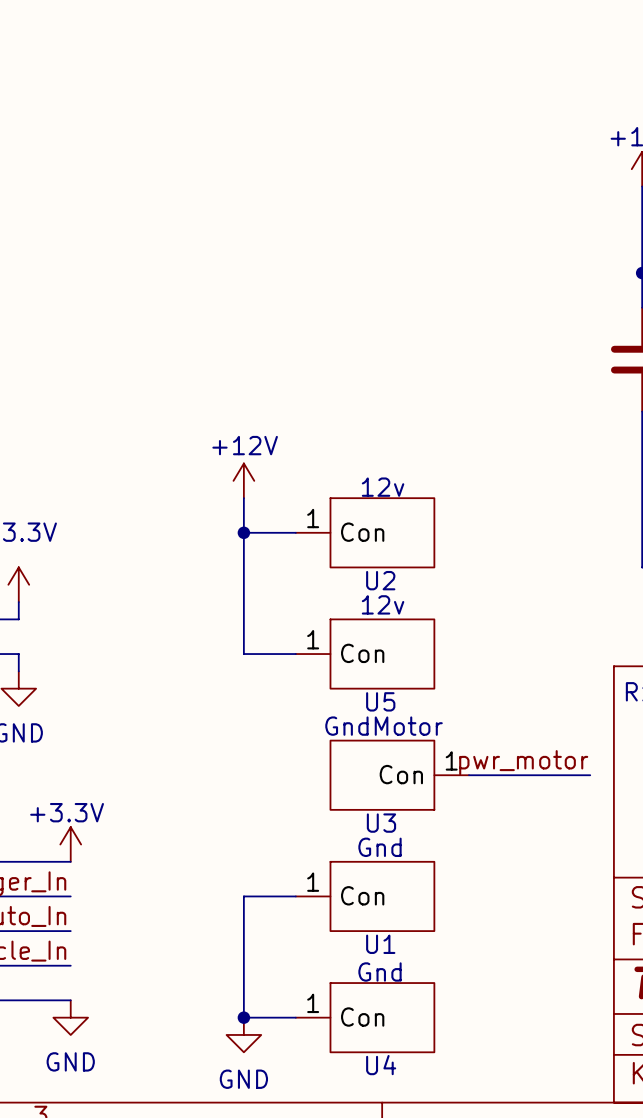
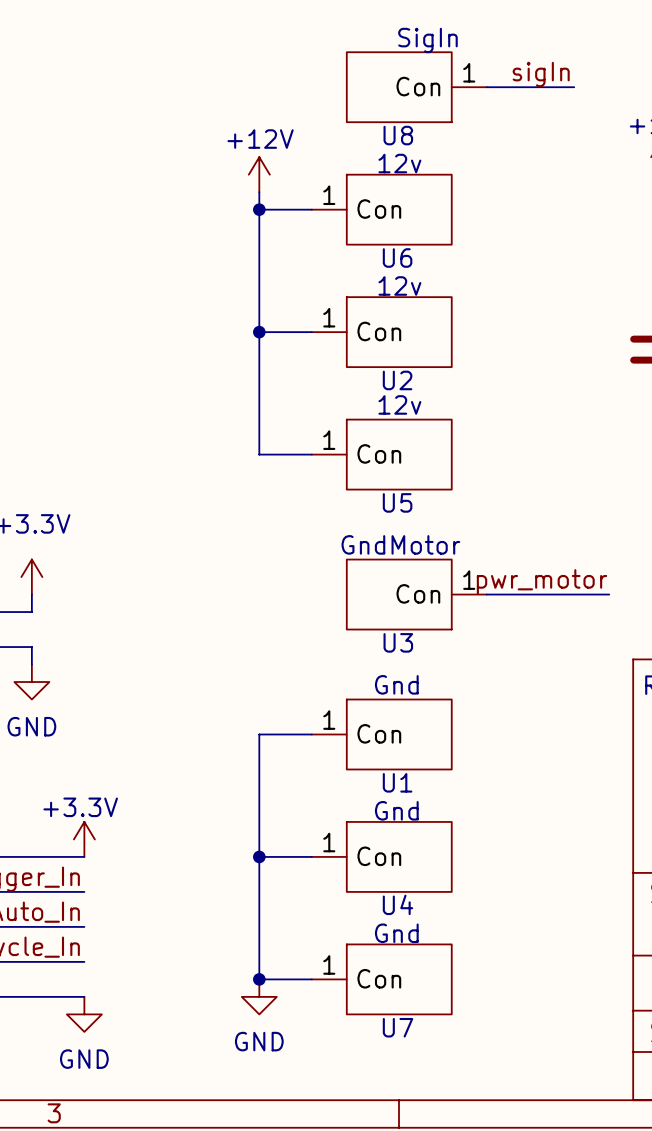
label: none -> sigIn (541, 74)
U8: none -> SigIn (416, 87)
wire: none -> (486, 87) (574, 87)
wire: none -> (259, 192) (259, 454) (311, 454)
wire: none -> (259, 209) (311, 209)
junction: none -> (259, 209)
U6: none -> 12v (381, 209)
junction: none -> (259, 332)
power symbol position: +12V (243, 480) -> +12V (259, 174)
wire: (243, 498) (243, 654) (295, 654) -> none
wire: (243, 532) (295, 532) -> (259, 332) (311, 332)
junction: (243, 532) -> none
U2 position: (365, 532) -> (381, 332)
U5 position: (365, 654) -> (381, 454)
label position: pwr_motor (523, 762) -> pwr_motor (542, 581)
U3 position: (399, 775) -> (416, 594)
wire: (469, 775) (590, 775) -> (486, 594) (609, 594)
wire: none -> (259, 856) (311, 856)
junction: none -> (259, 856)
wire: (243, 896) (295, 896) -> (259, 891) (259, 734) (311, 734)
U1 position: (365, 896) -> (381, 734)
wire: (243, 983) (243, 1017) (295, 1017) -> (259, 979) (311, 979)
U7: none -> Gnd (381, 979)
junction position: (243, 1017) -> (259, 979)
U4 position: (365, 1017) -> (381, 856)
power symbol position: GND (243, 1034) -> GND (259, 996)

